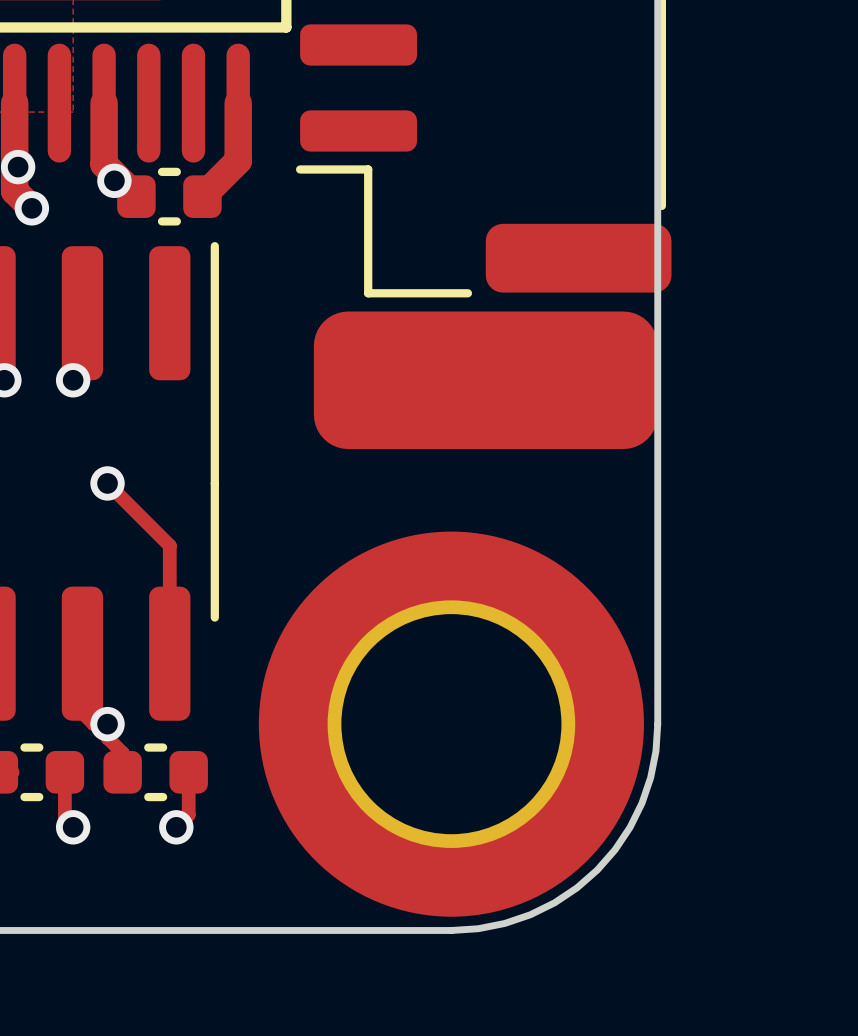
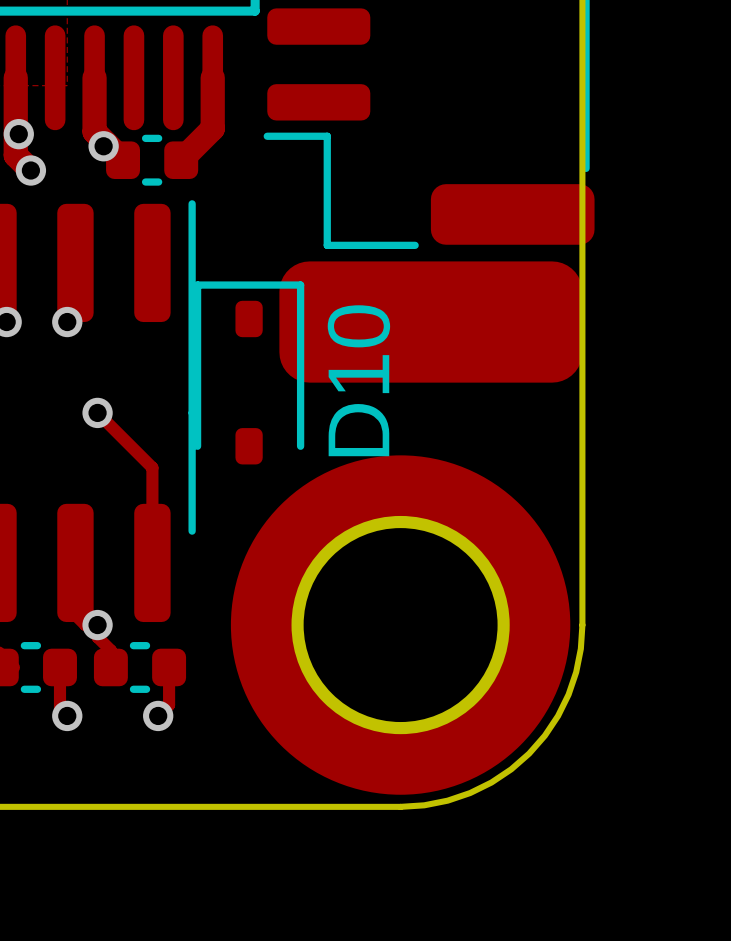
D10: none -> (249, 372)

